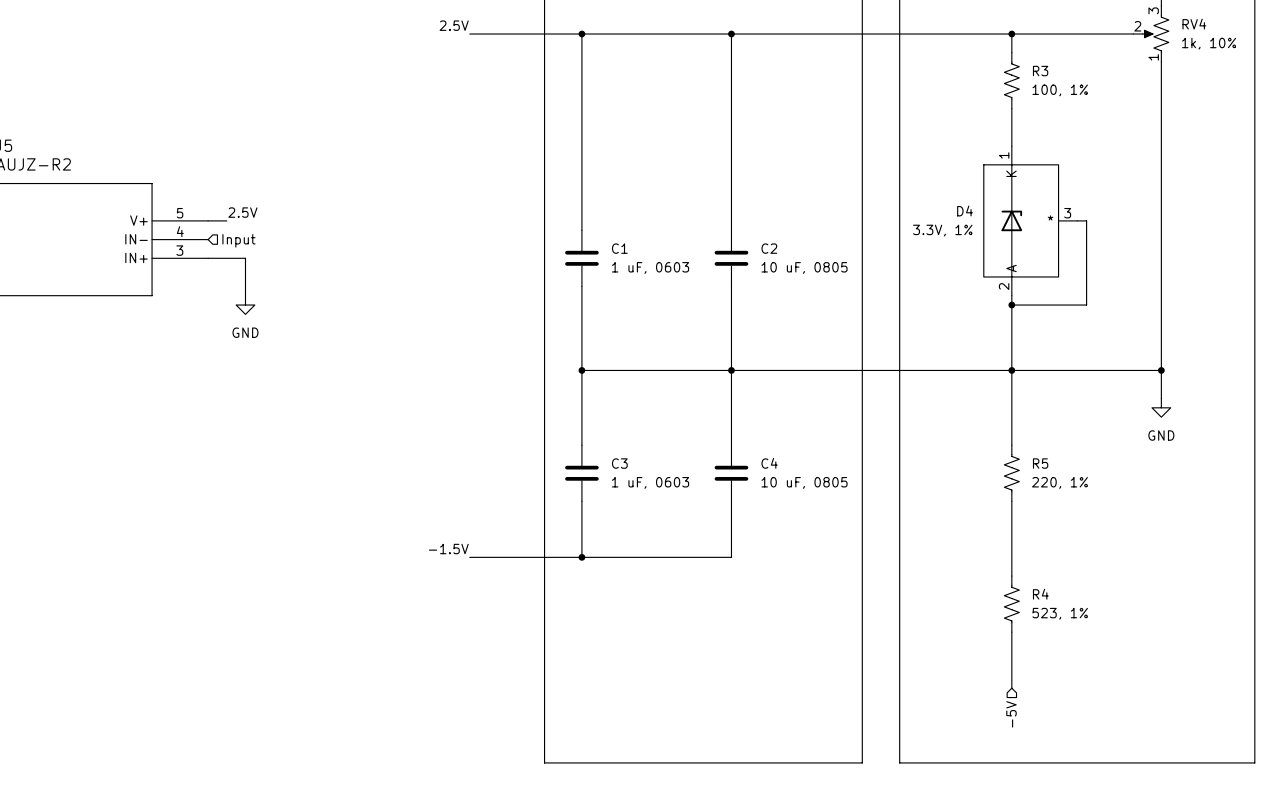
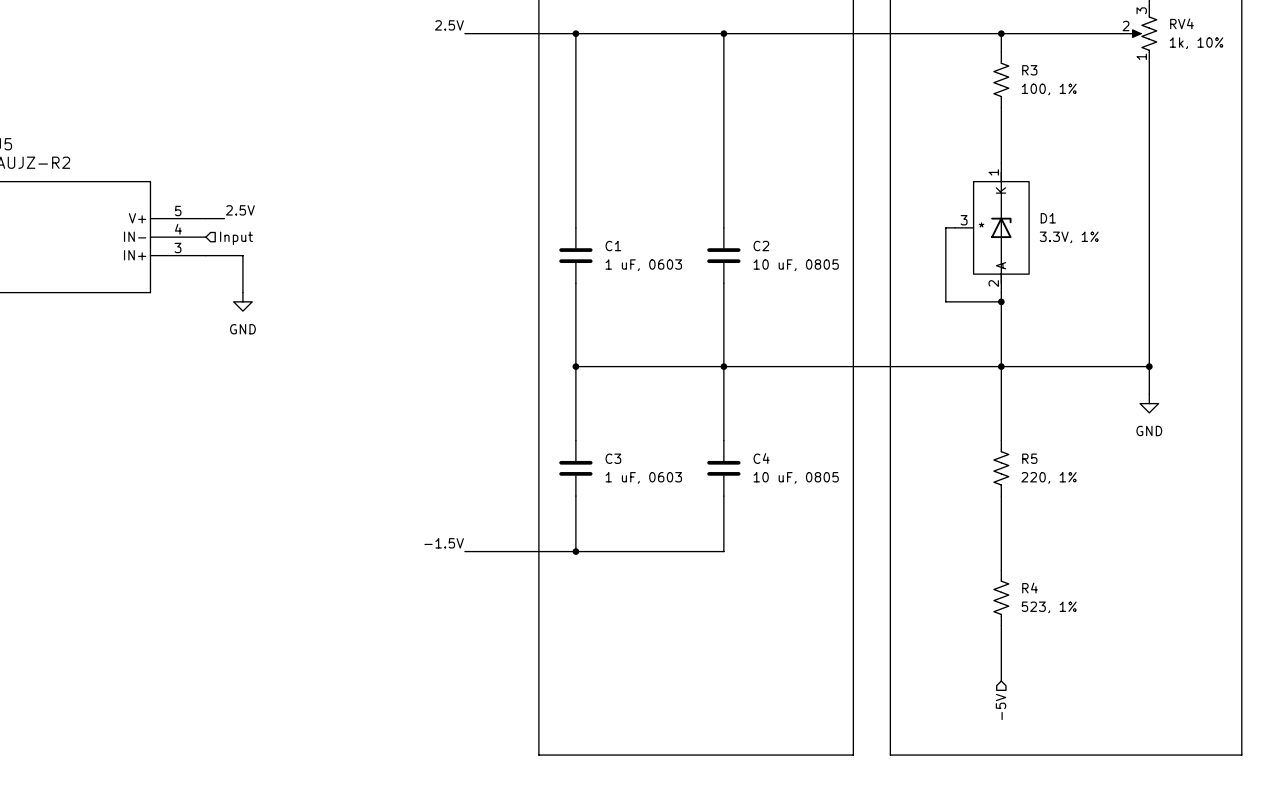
D4: 3.3V, 1% (1030, 220) -> none
wire: (1077, 220) (1086, 220) (1086, 305) (1011, 305) -> (955, 227) (945, 227) (945, 301) (1001, 301)
D1: none -> 3.3V, 1% (992, 227)

